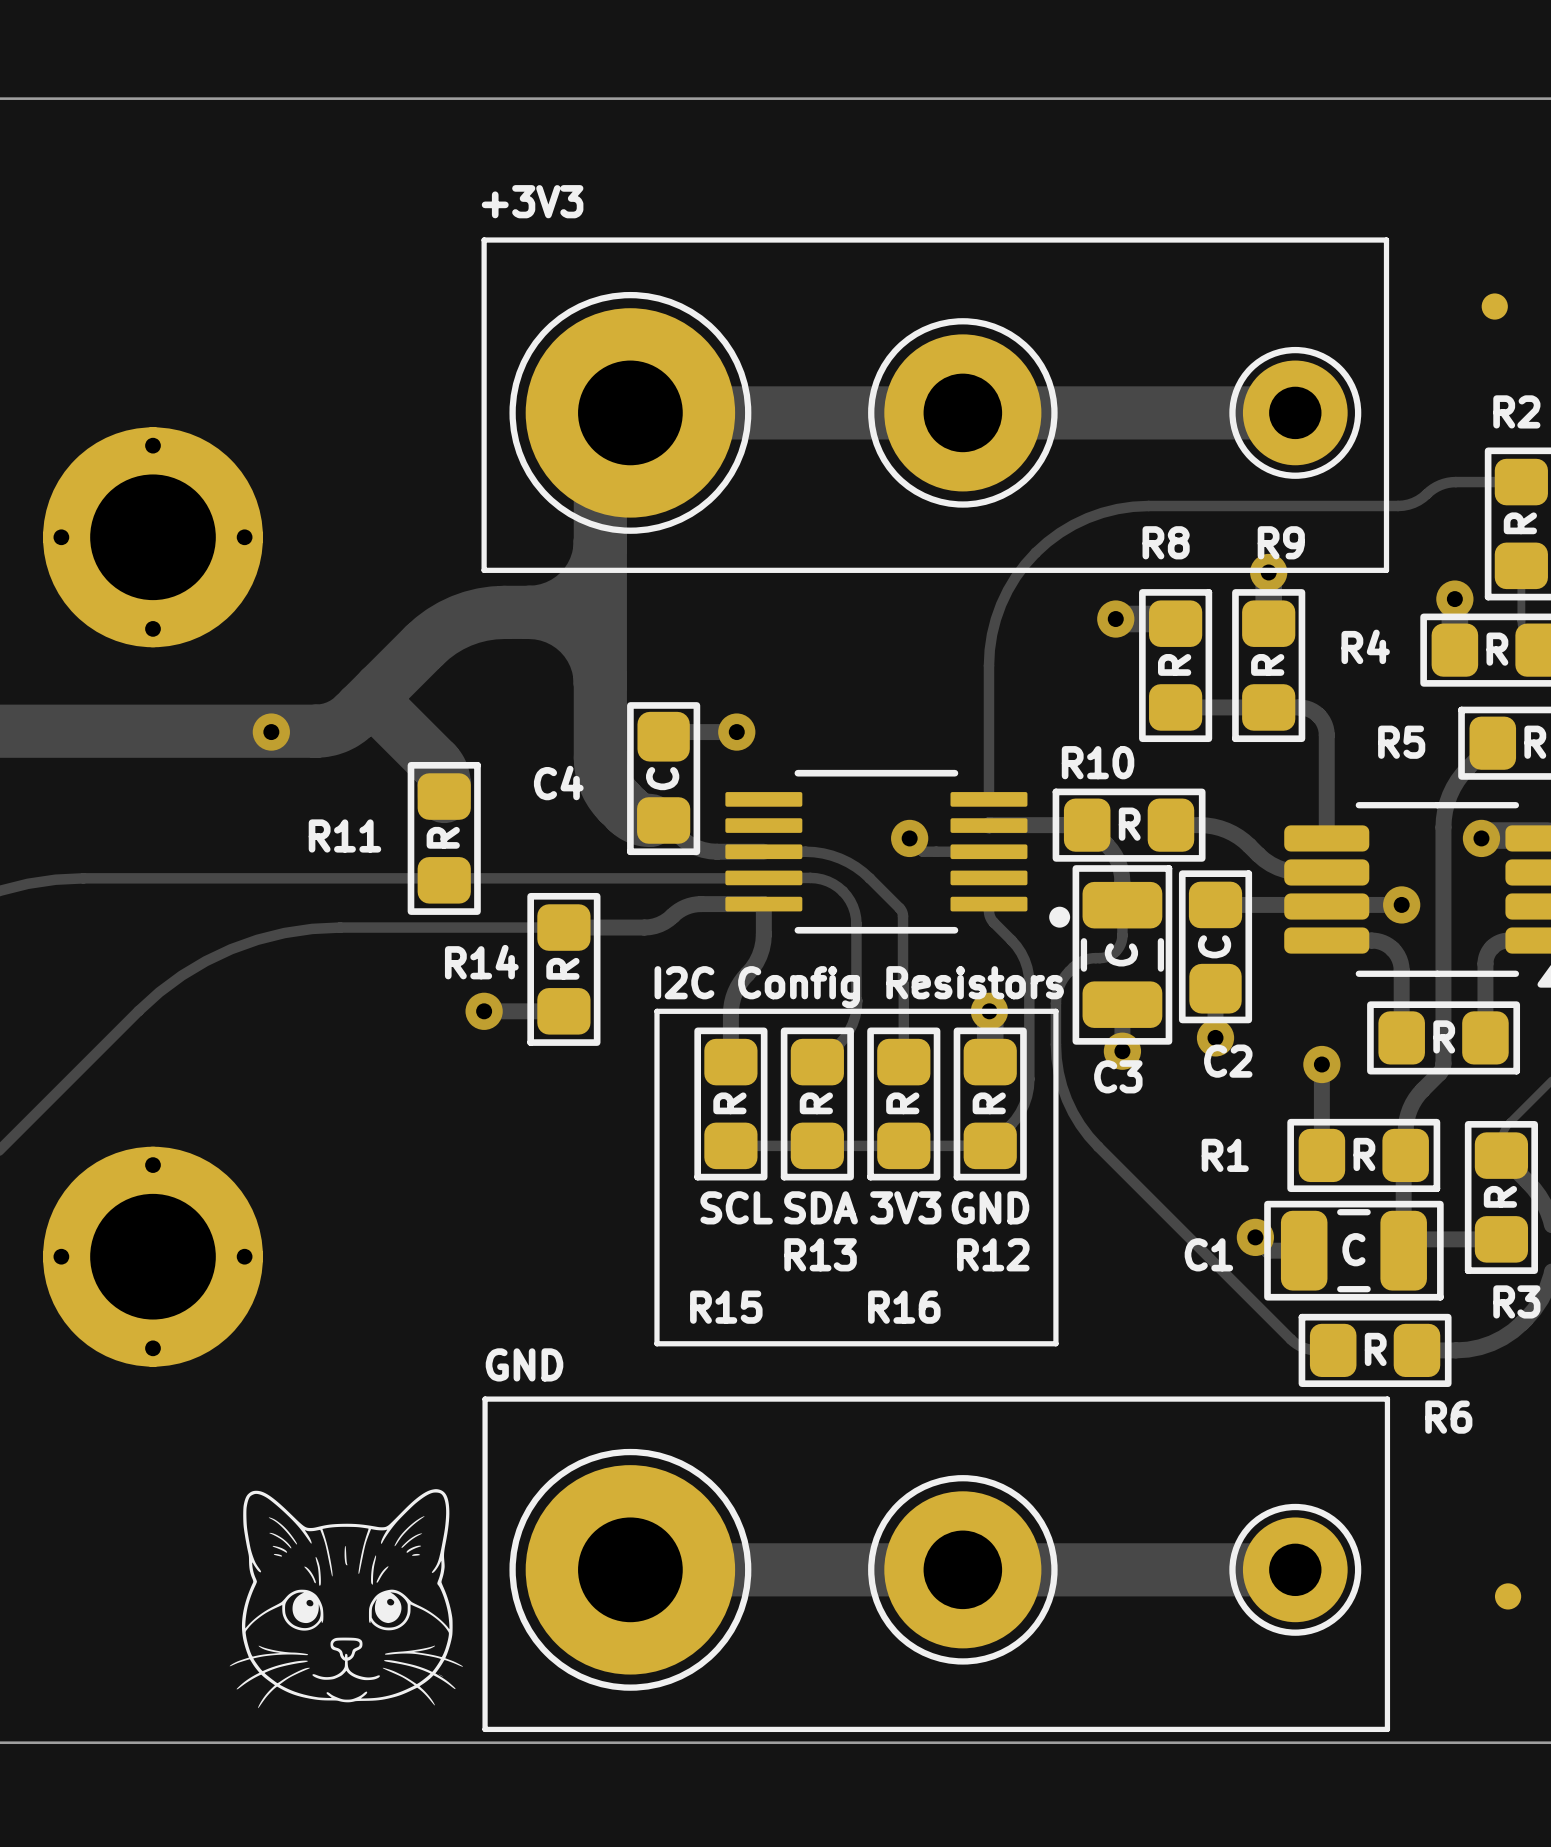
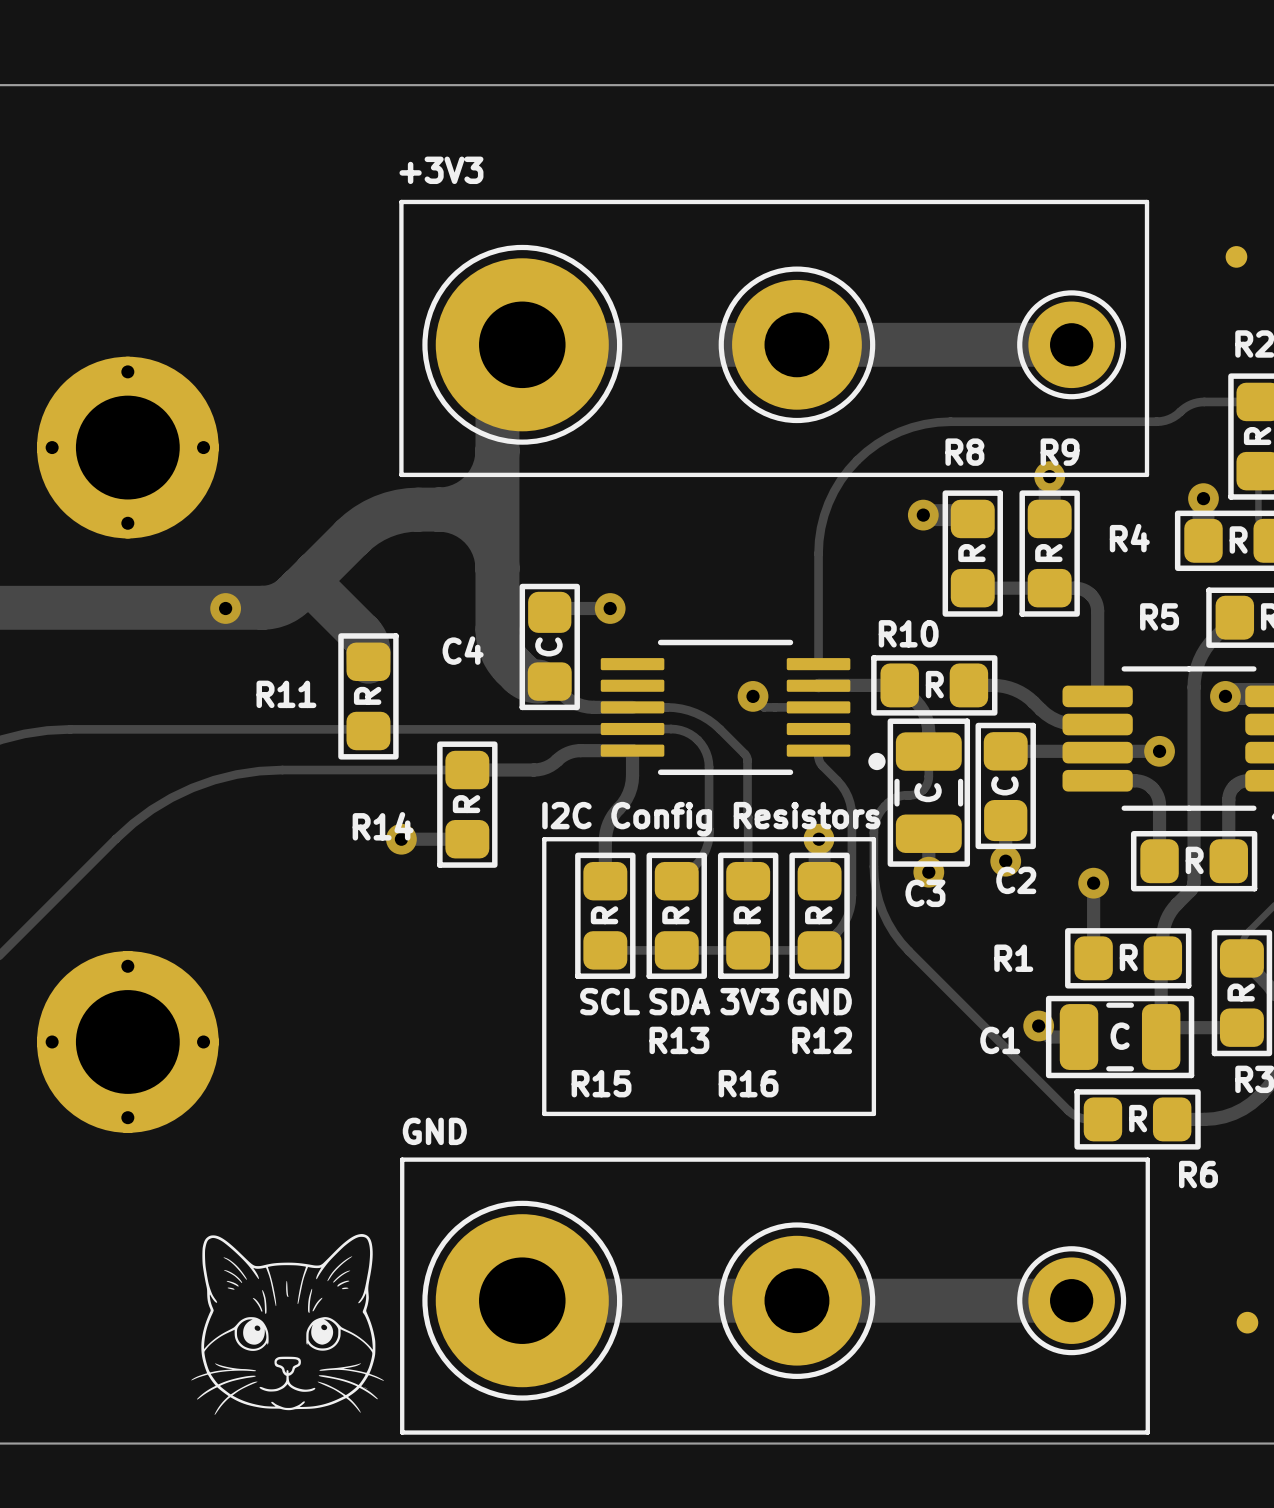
R14 name position: R14 (481, 962) -> R14 (383, 826)

